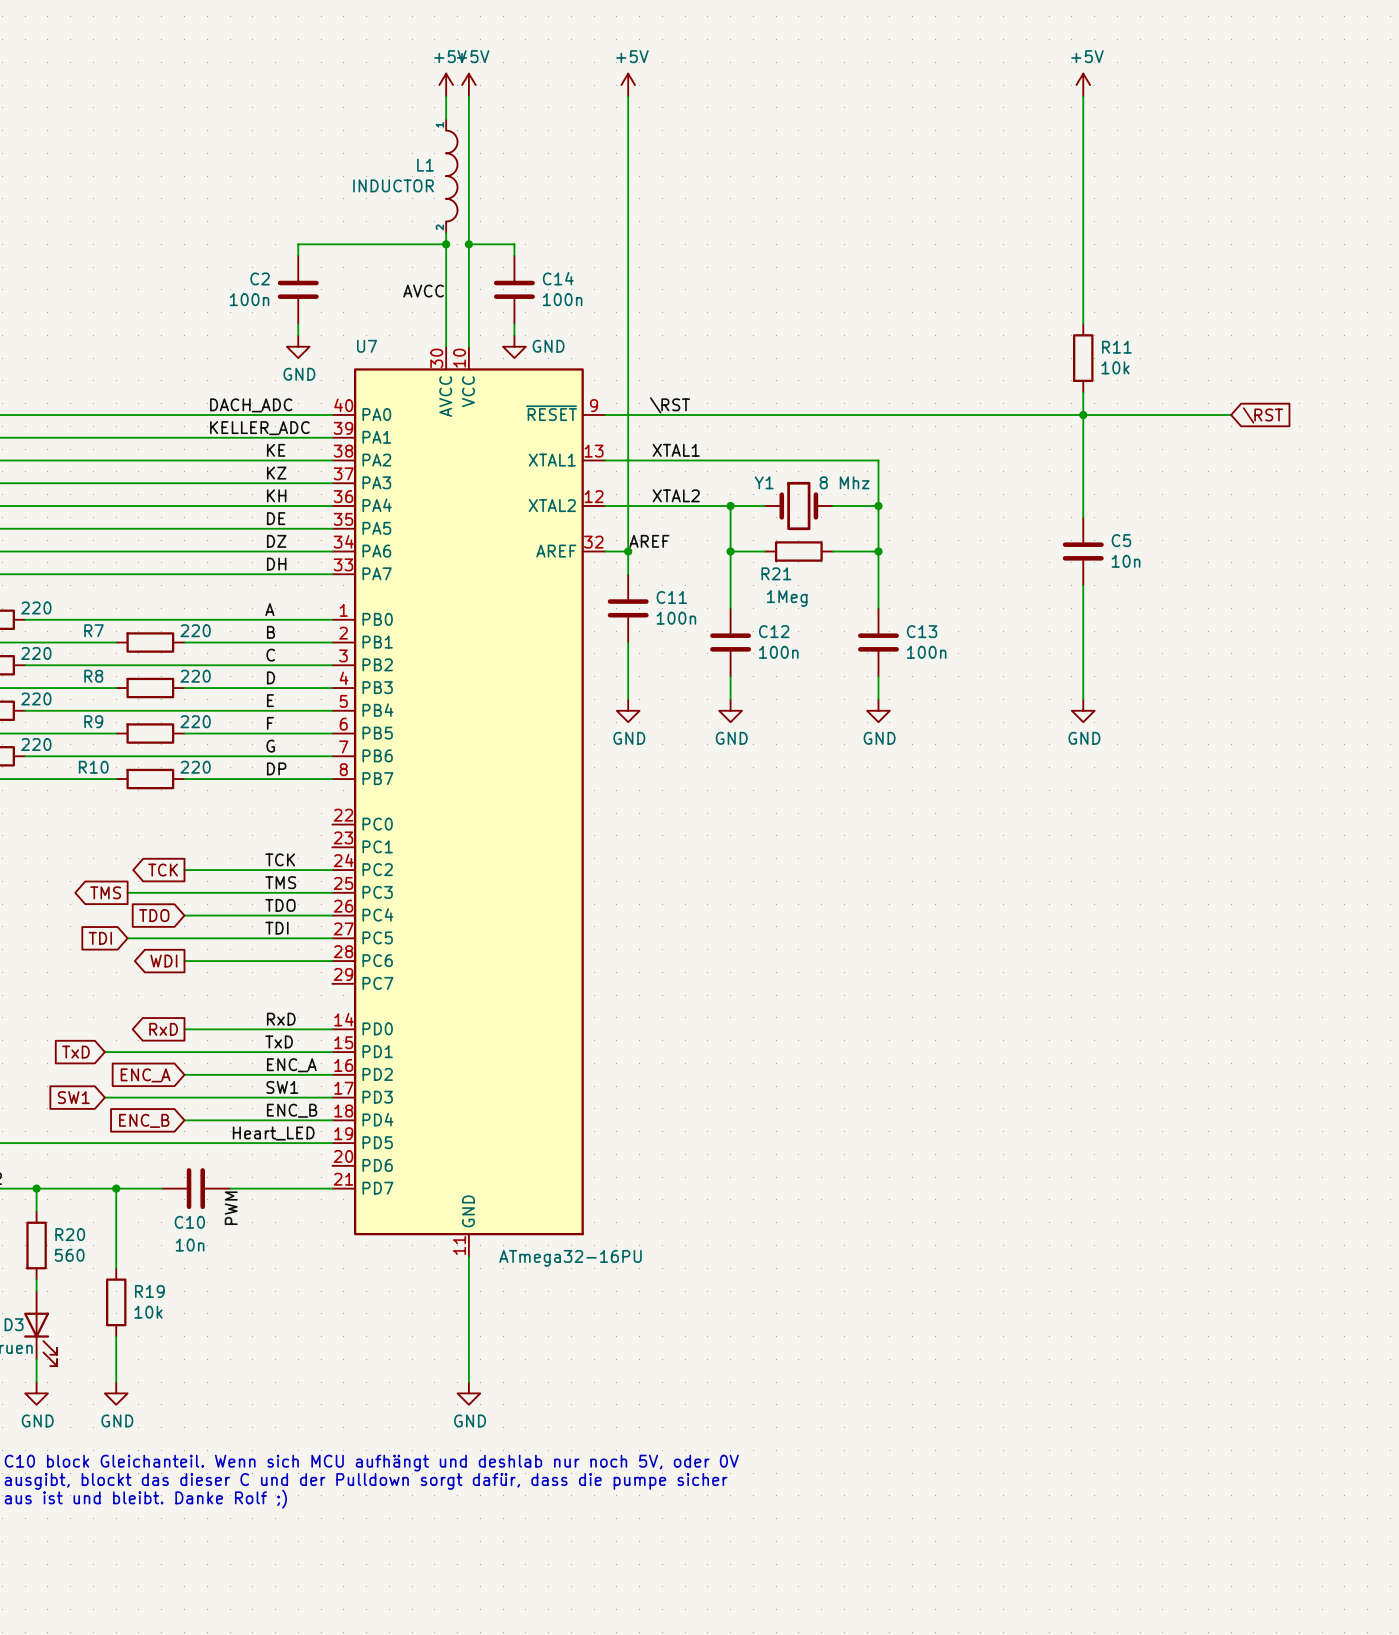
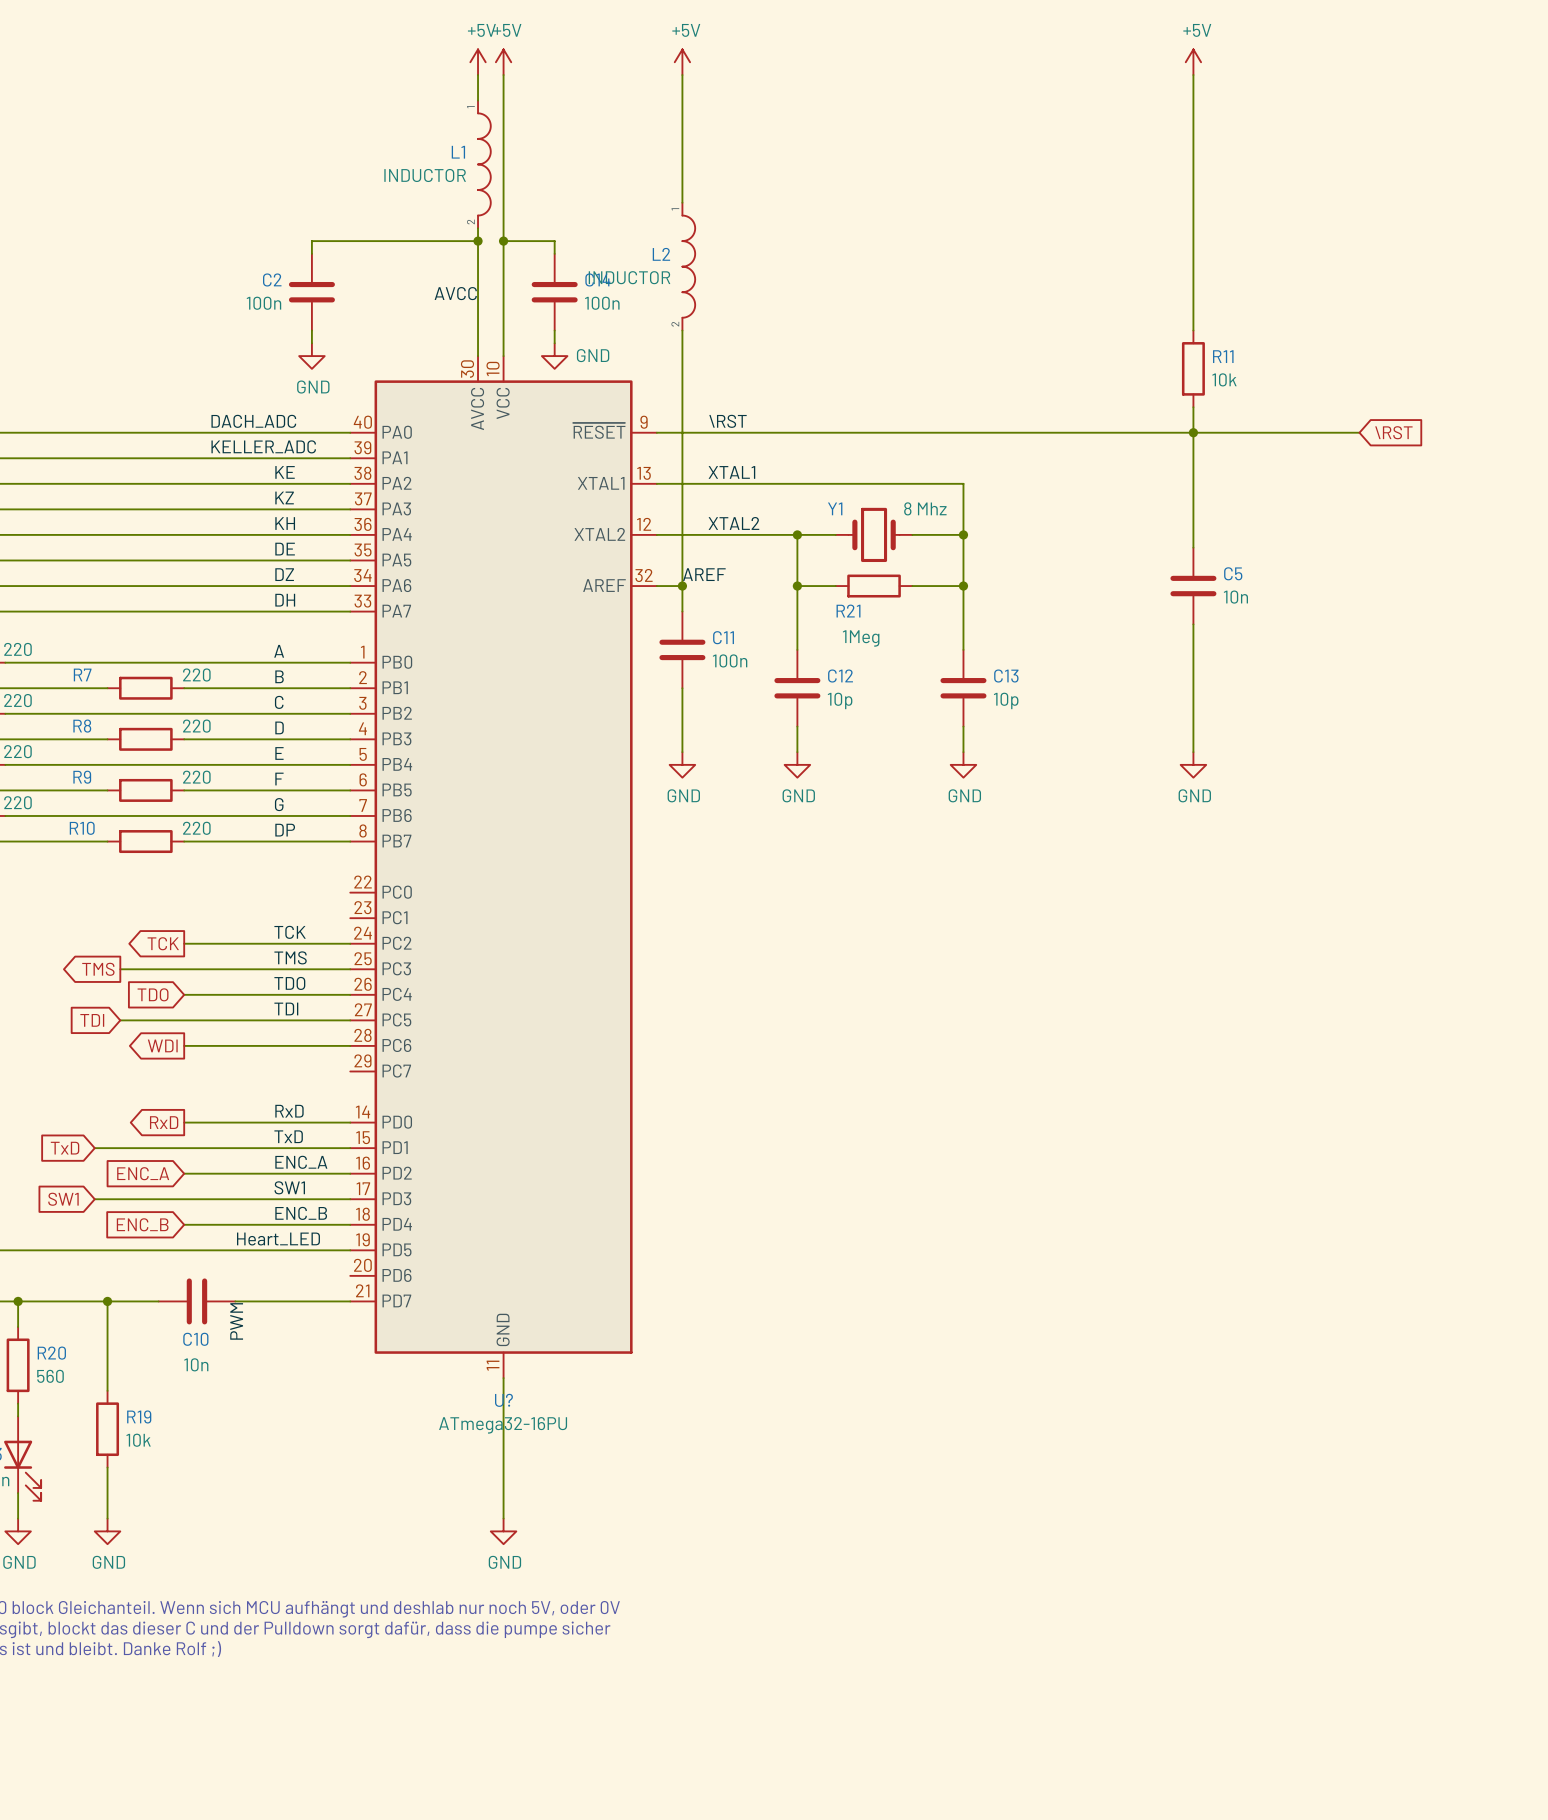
wire: (628, 210) (628, 323) -> none
L2: none -> INDUCTOR (688, 266)
U7 name: U7 (367, 346) -> U? (503, 1400)
C12 value: 100n (778, 652) -> 10p (840, 700)
C13 value: 100n (926, 652) -> 10p (1006, 700)
U7 value position: ATmega32-16PU (570, 1258) -> ATmega32-16PU (503, 1425)

